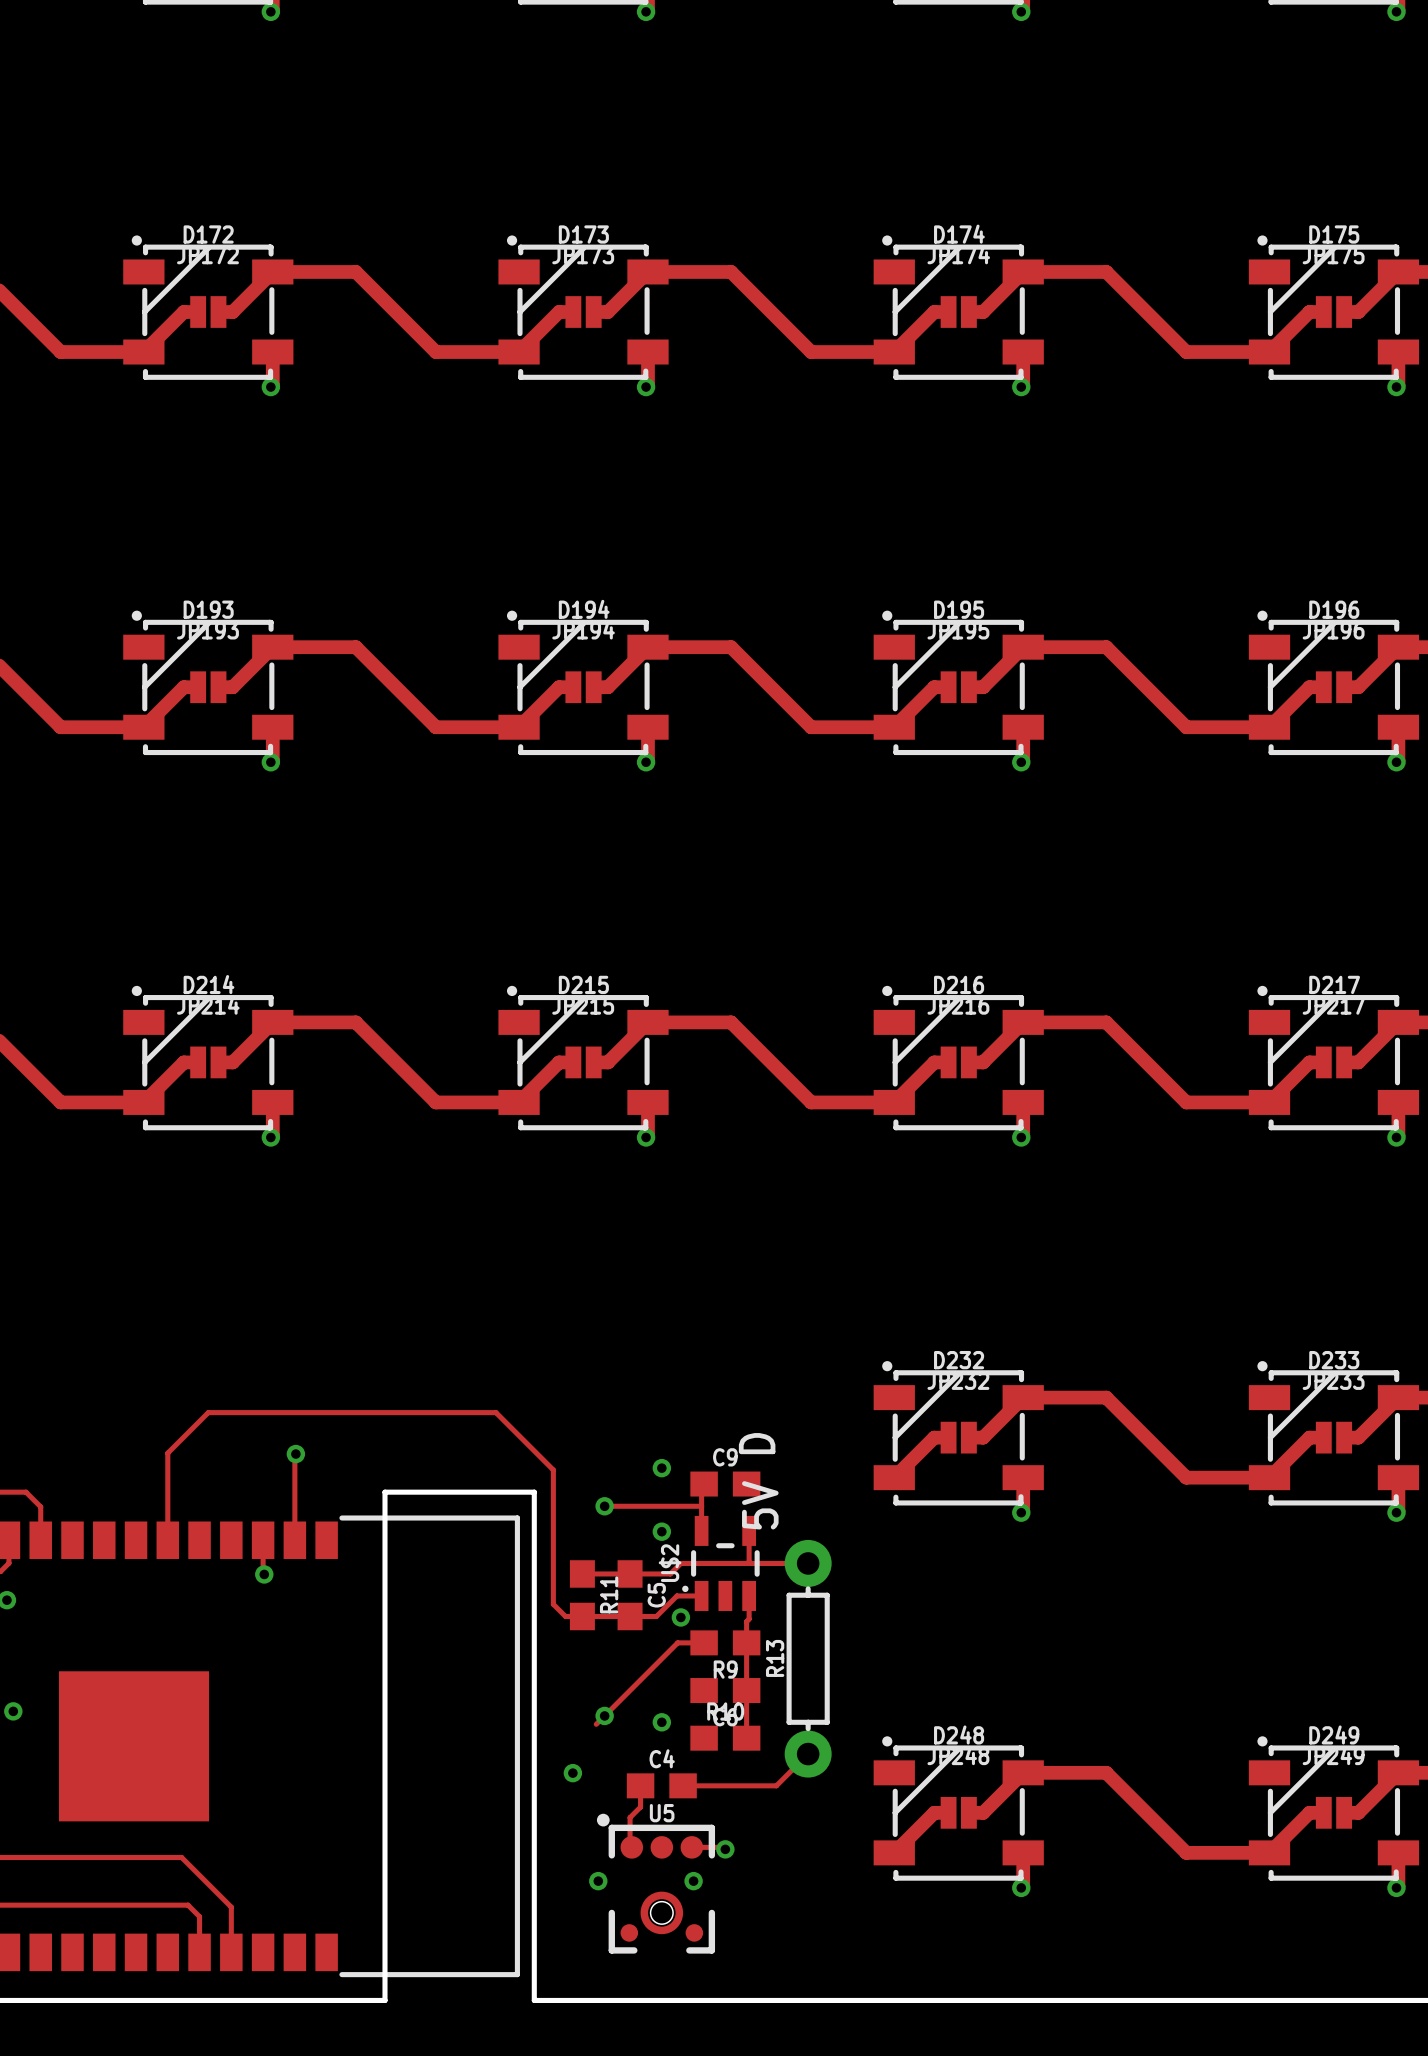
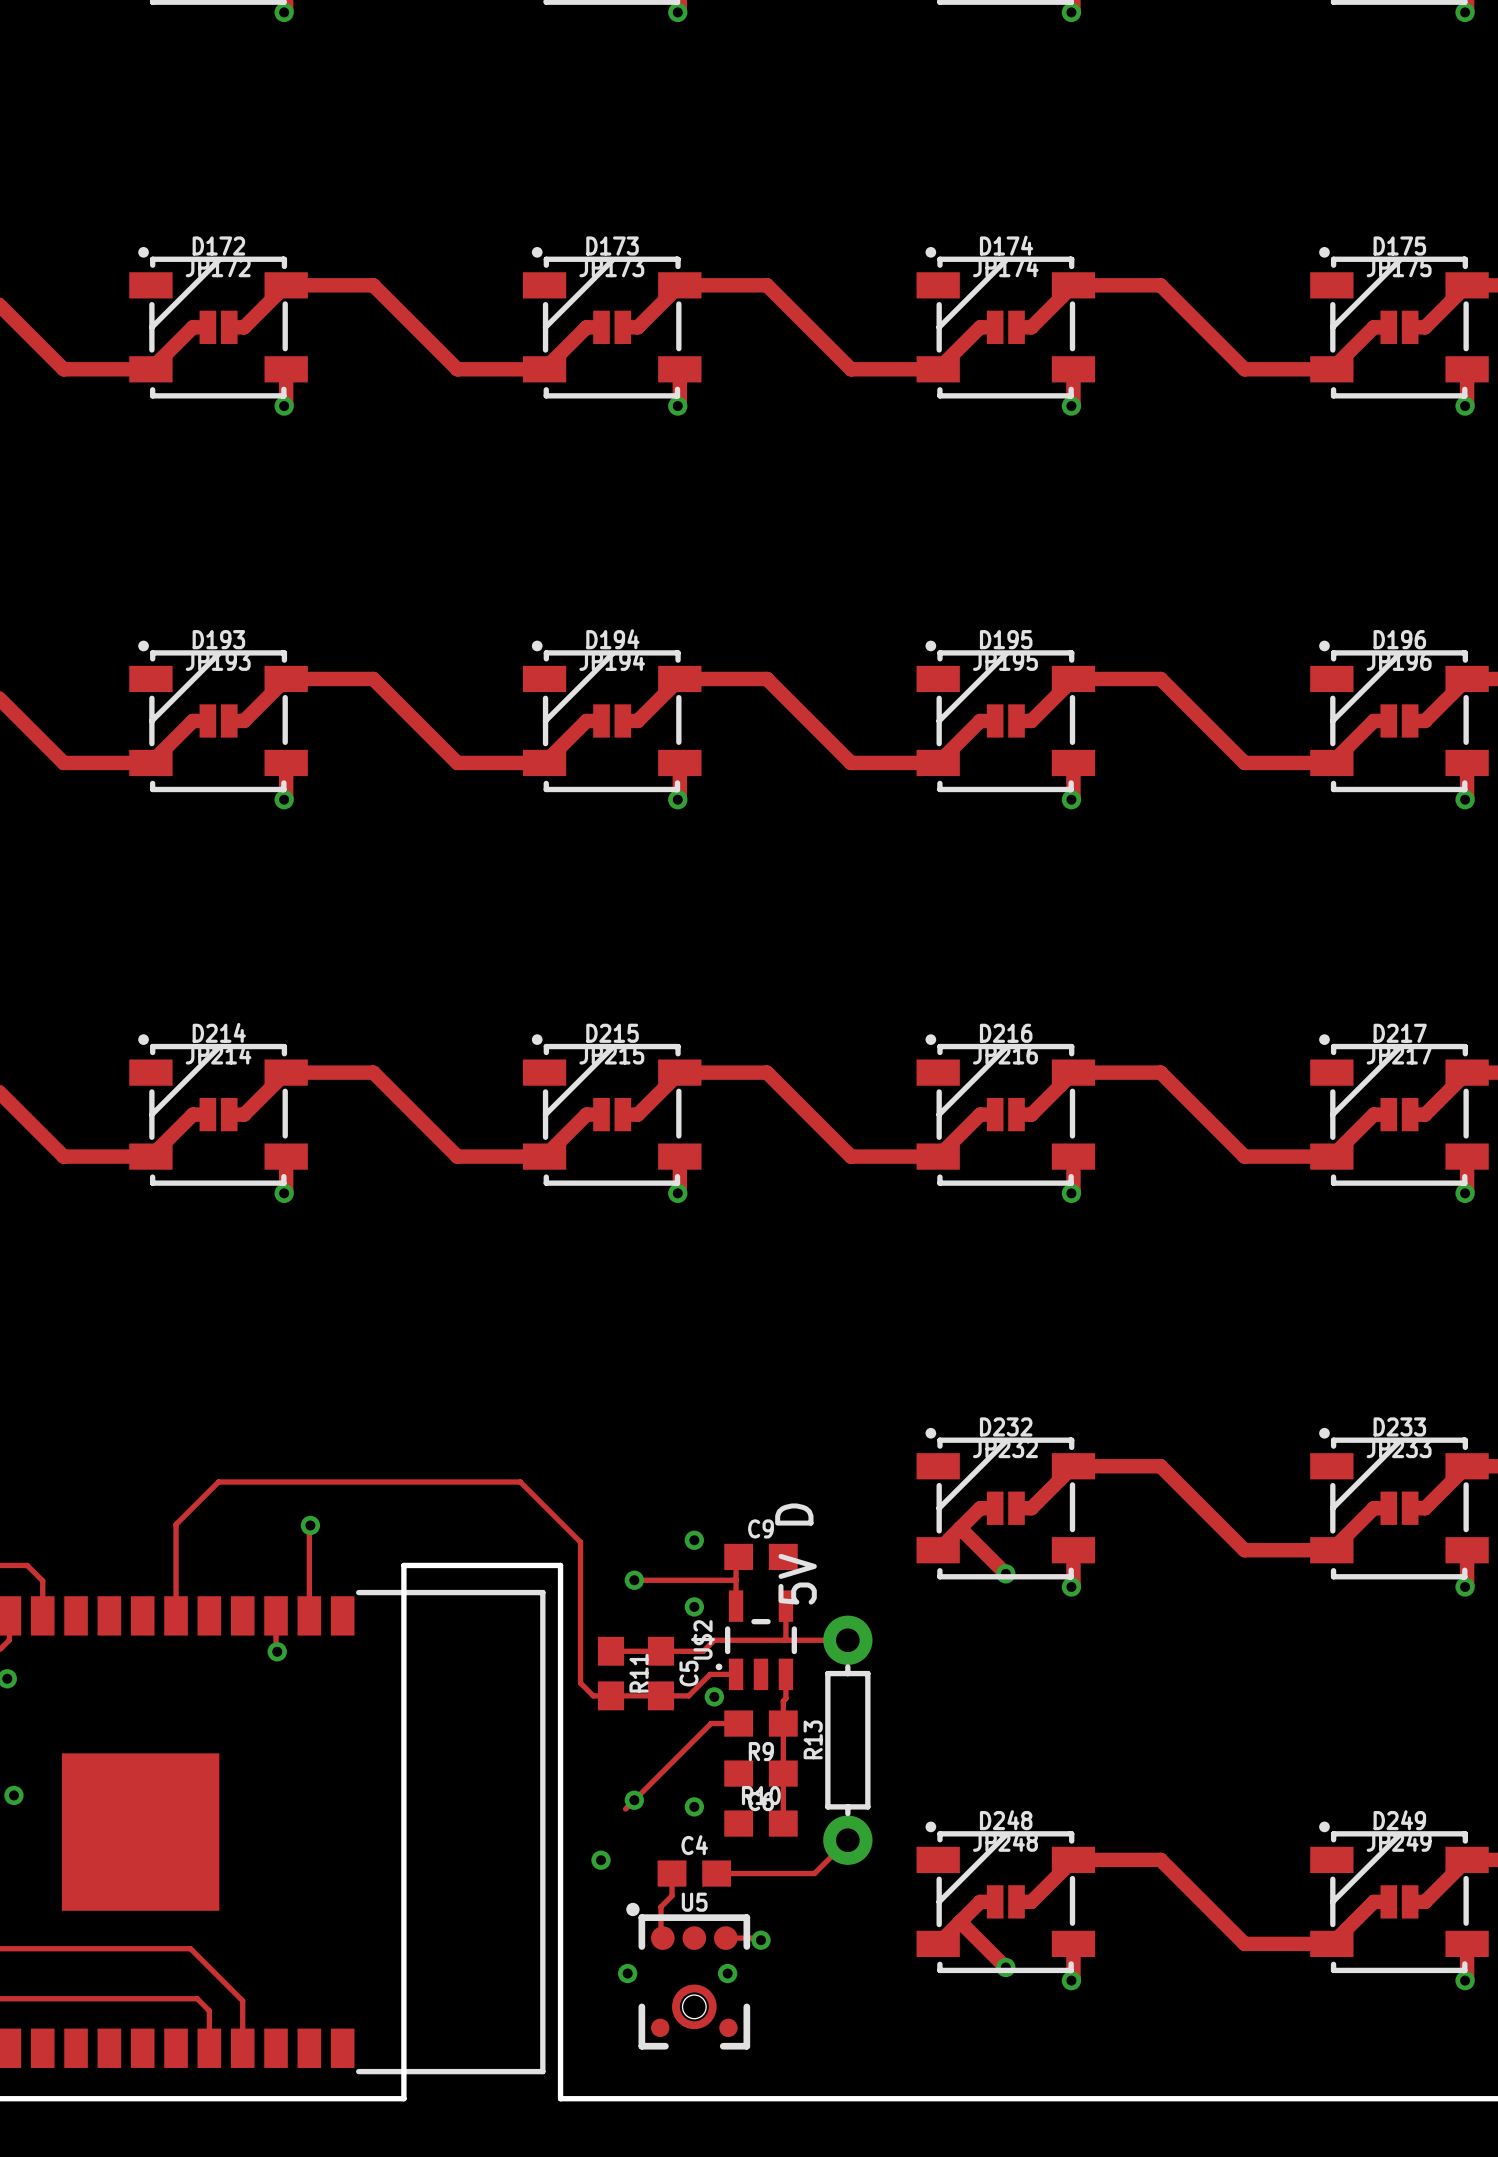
track: none -> (960, 1528) (1005, 1573)
via: none -> (1005, 1573)
track: none -> (960, 1921) (1005, 1967)
via: none -> (1005, 1967)

